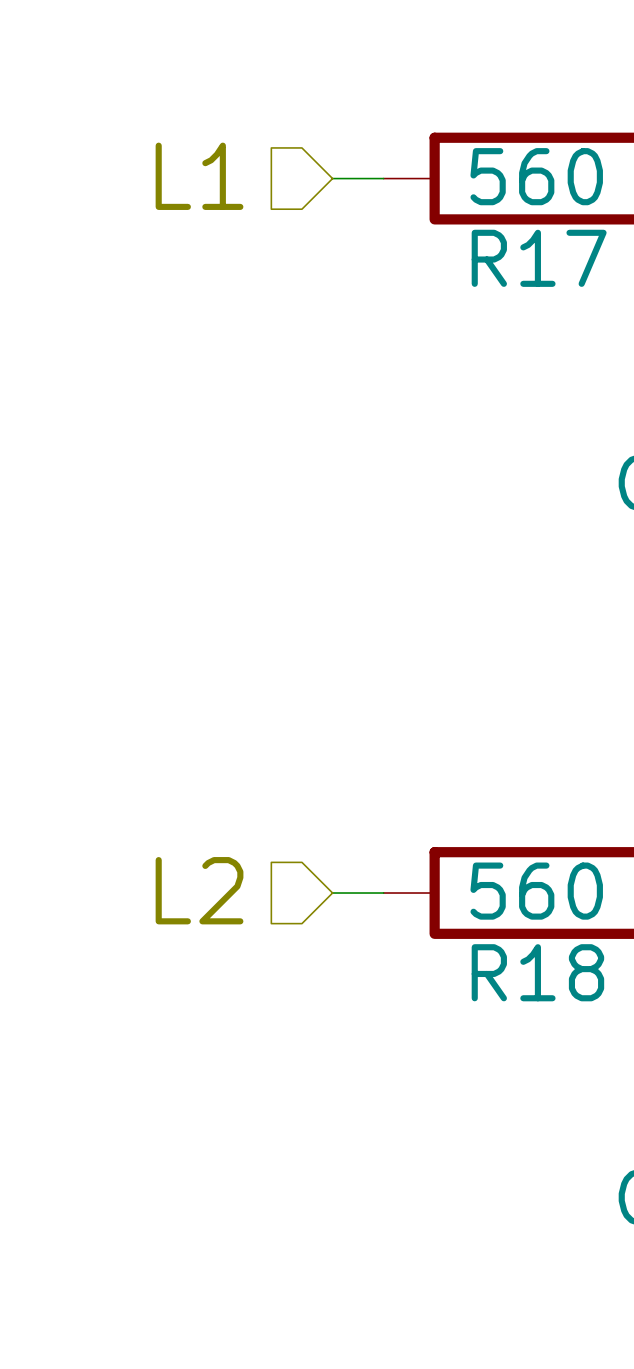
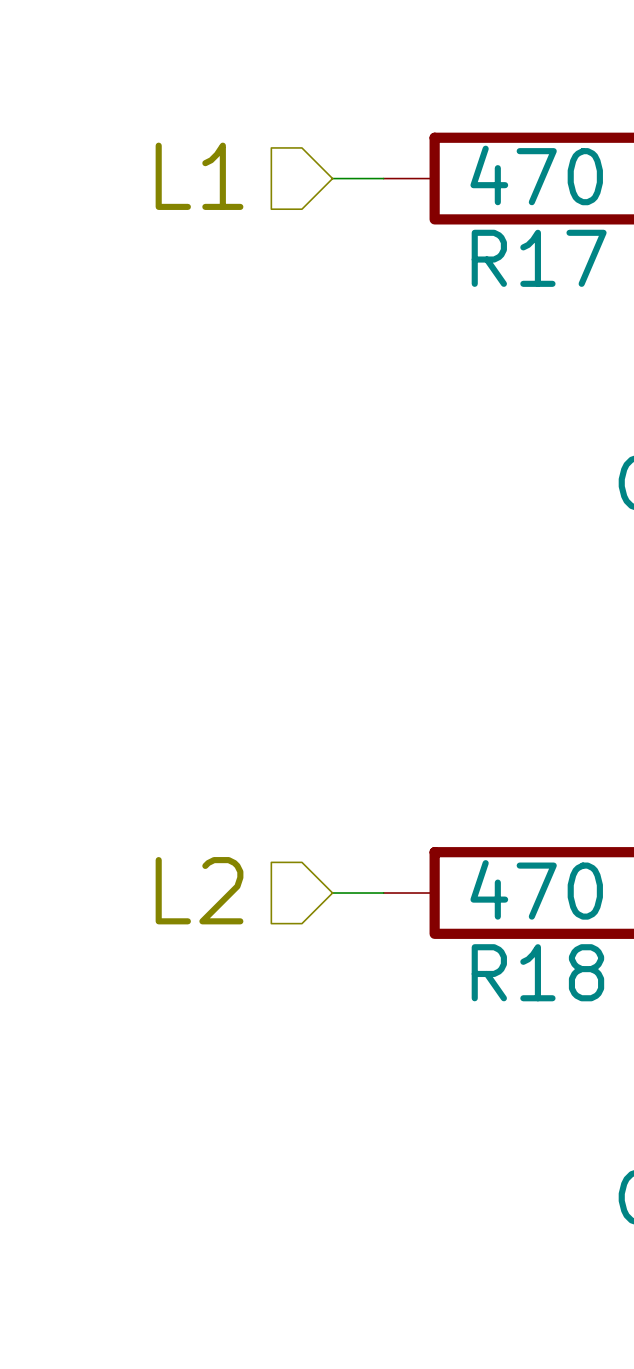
R17 value: 560 (536, 176) -> 470 (536, 175)
R18 value: 560 (536, 891) -> 470 (536, 889)

